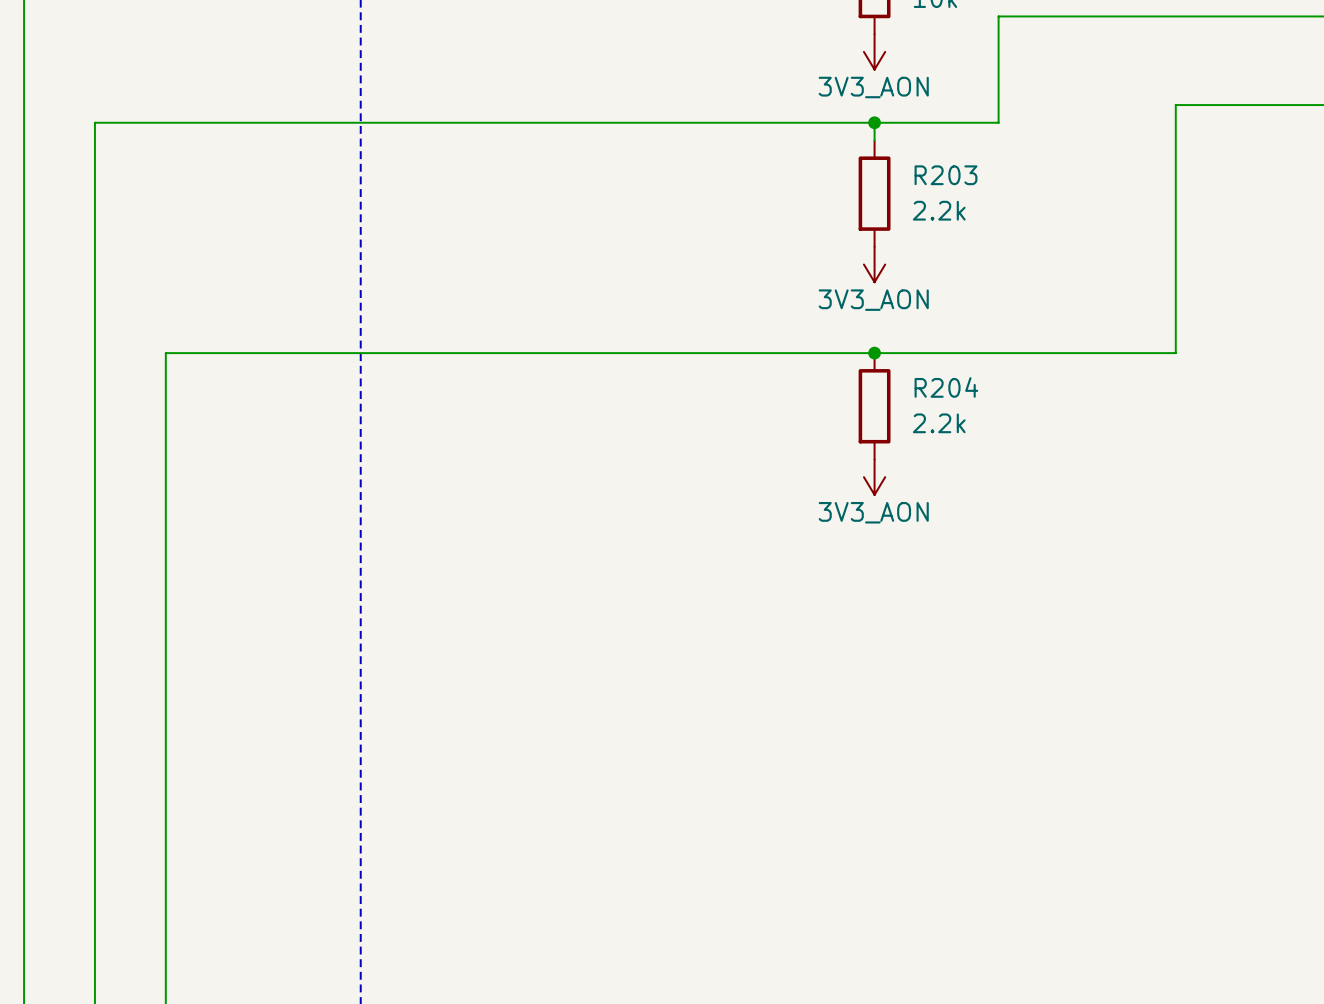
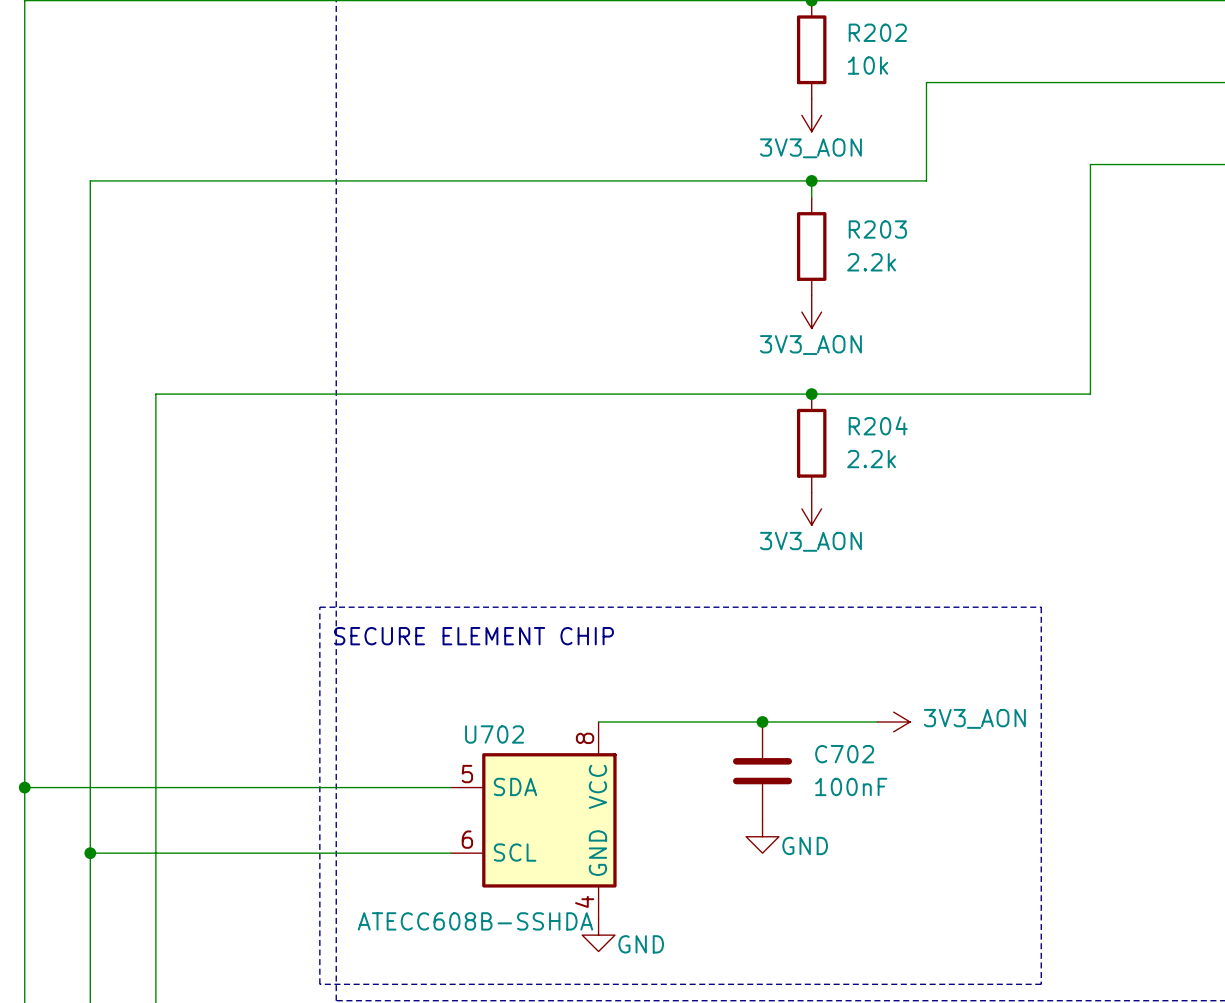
line: none -> (319, 607) (1041, 607) (1041, 984) (319, 984) (319, 607)
text: none -> SECURE ELEMENT CHIP (473, 636)
wire: none -> (598, 721) (877, 721)
junction: none -> (762, 721)
power symbol: none -> 3V3_AON (893, 721)
C702: none -> 100nF (762, 771)
wire: none -> (24, 787) (451, 787)
junction: none -> (24, 787)
U702: none -> ATECC608B-SSHDA (533, 820)
power symbol: none -> GND (762, 836)
wire: none -> (90, 853) (451, 853)
junction: none -> (90, 853)
power symbol: none -> GND (598, 935)

